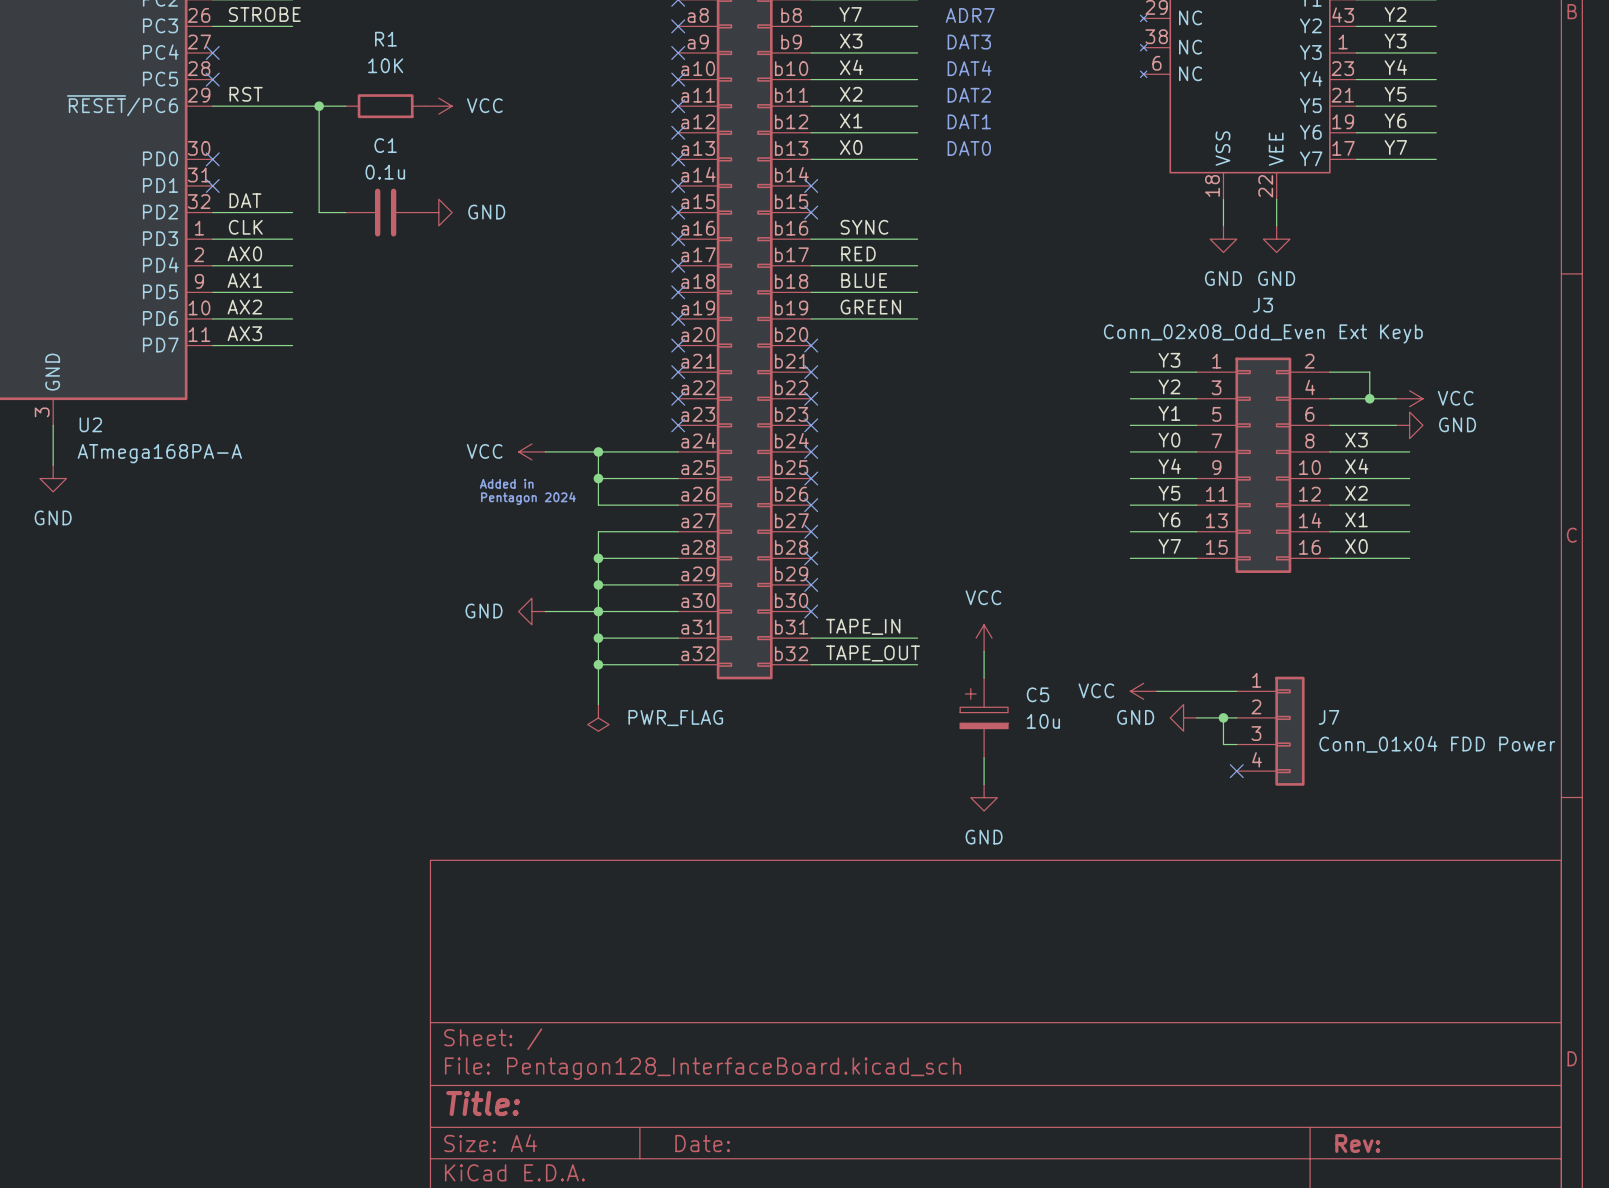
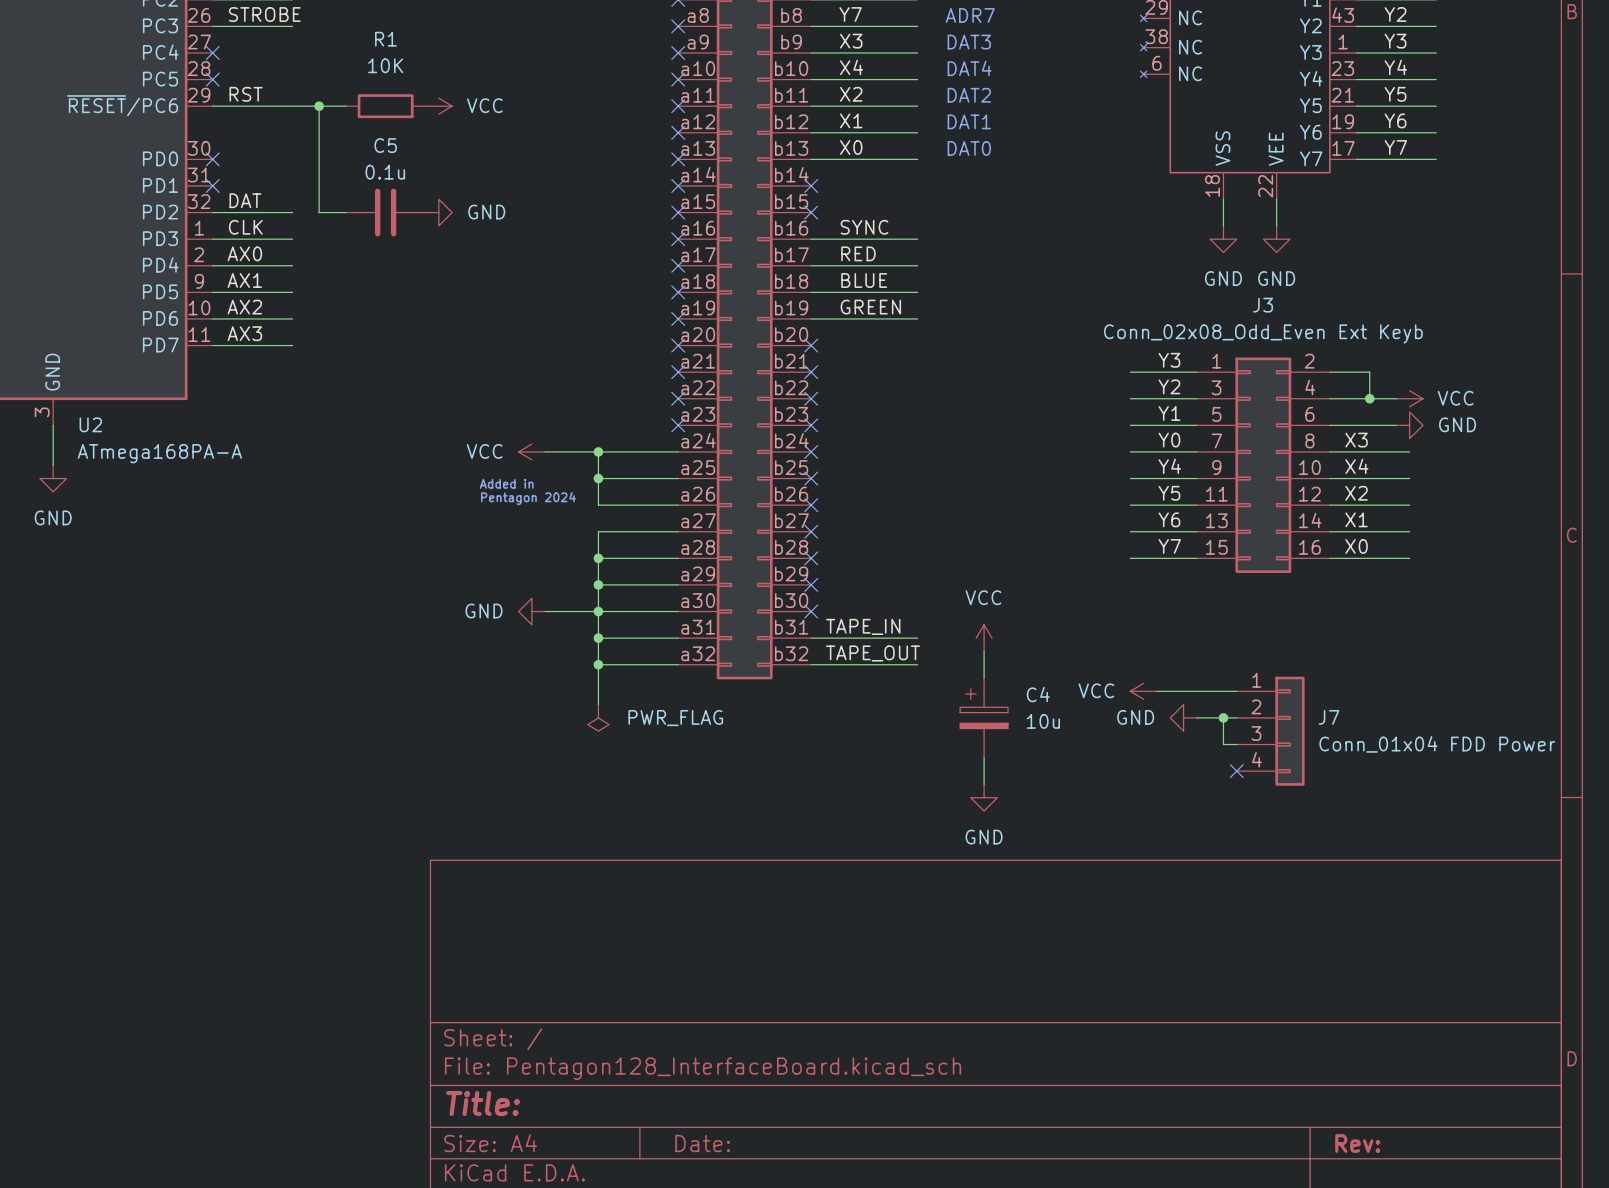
C1 name: C1 (385, 145) -> C5 (385, 145)
C5 name: C5 (1038, 694) -> C4 (1038, 694)

